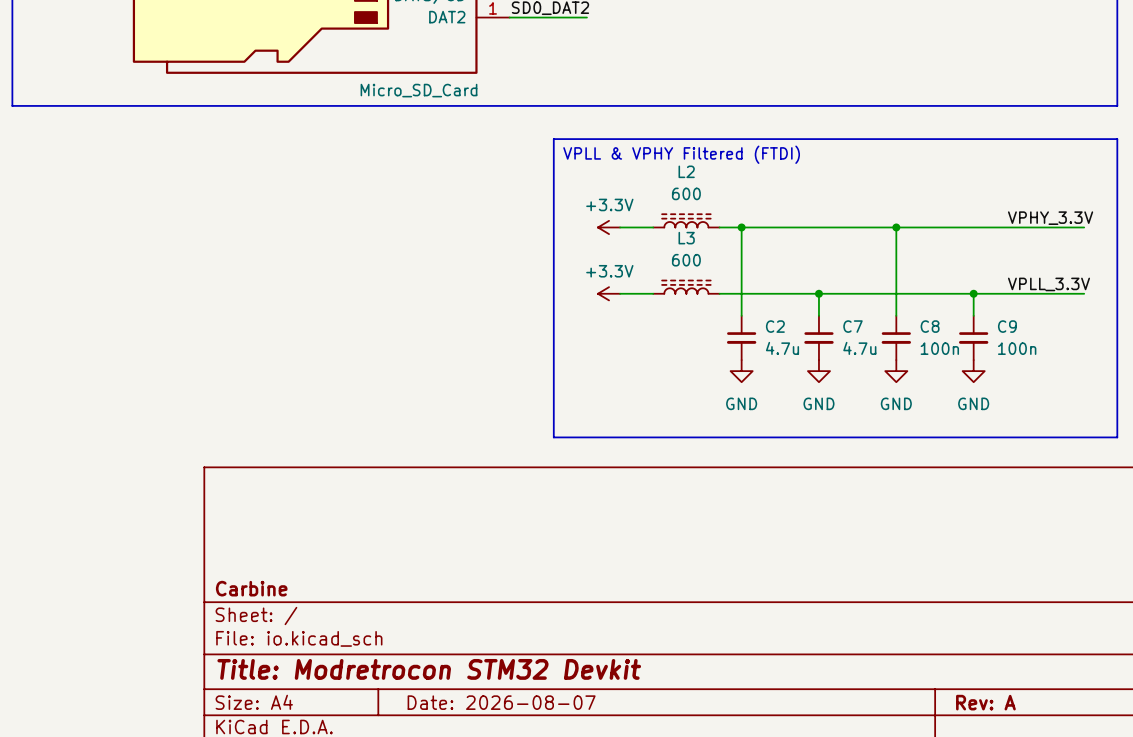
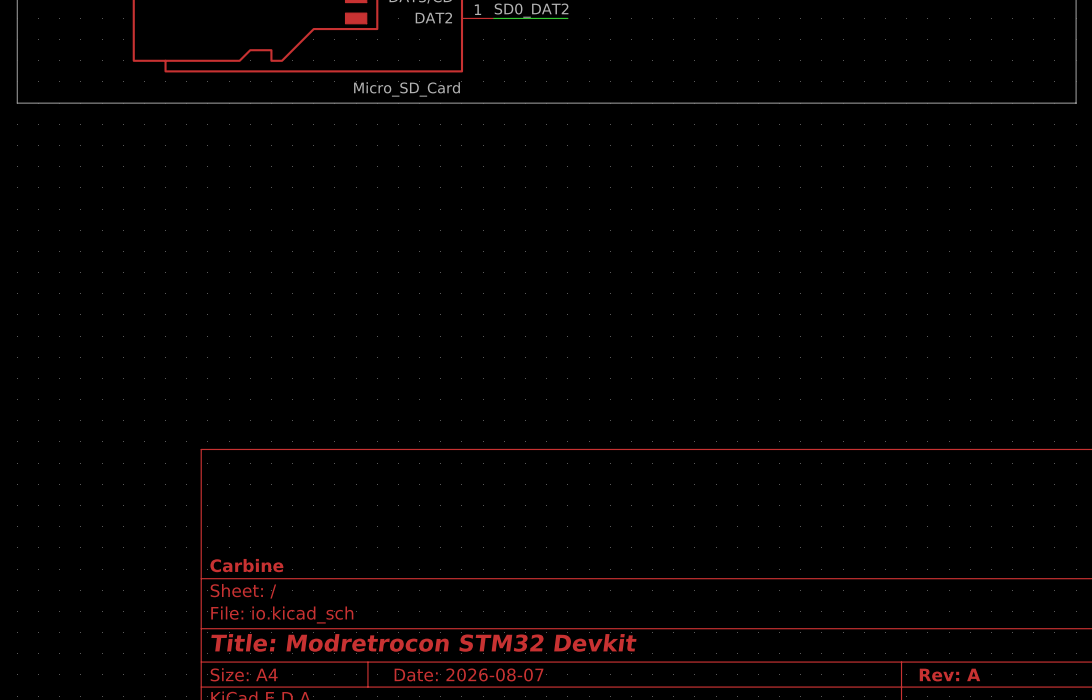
line: (553, 139) (1117, 139) (1117, 437) (553, 437) (553, 139) -> none
text: VPLL & VPHY Filtered (FTDI) (681, 154) -> none
label: VPHY_3.3V (1050, 218) -> none
L2: 600 (686, 220) -> none
power symbol: +3.3V (609, 227) -> none
wire: (620, 227) (653, 227) -> none
wire: (719, 227) (1084, 227) -> none
wire: (741, 227) (741, 315) -> none
junction: (741, 227) -> none
wire: (896, 227) (896, 315) -> none
junction: (896, 227) -> none
label: VPLL_3.3V (1048, 284) -> none
L3: 600 (686, 287) -> none
power symbol: +3.3V (609, 293) -> none
wire: (620, 293) (653, 293) -> none
wire: (719, 293) (1084, 293) -> none
wire: (818, 293) (818, 315) -> none
junction: (818, 293) -> none
wire: (973, 293) (973, 315) -> none
junction: (973, 293) -> none
C2: 4.7u (741, 337) -> none
C7: 4.7u (818, 337) -> none
C8: 100n (896, 337) -> none
C9: 100n (973, 337) -> none
power symbol: GND (741, 371) -> none
power symbol: GND (818, 371) -> none
power symbol: GND (896, 371) -> none
power symbol: GND (973, 371) -> none

